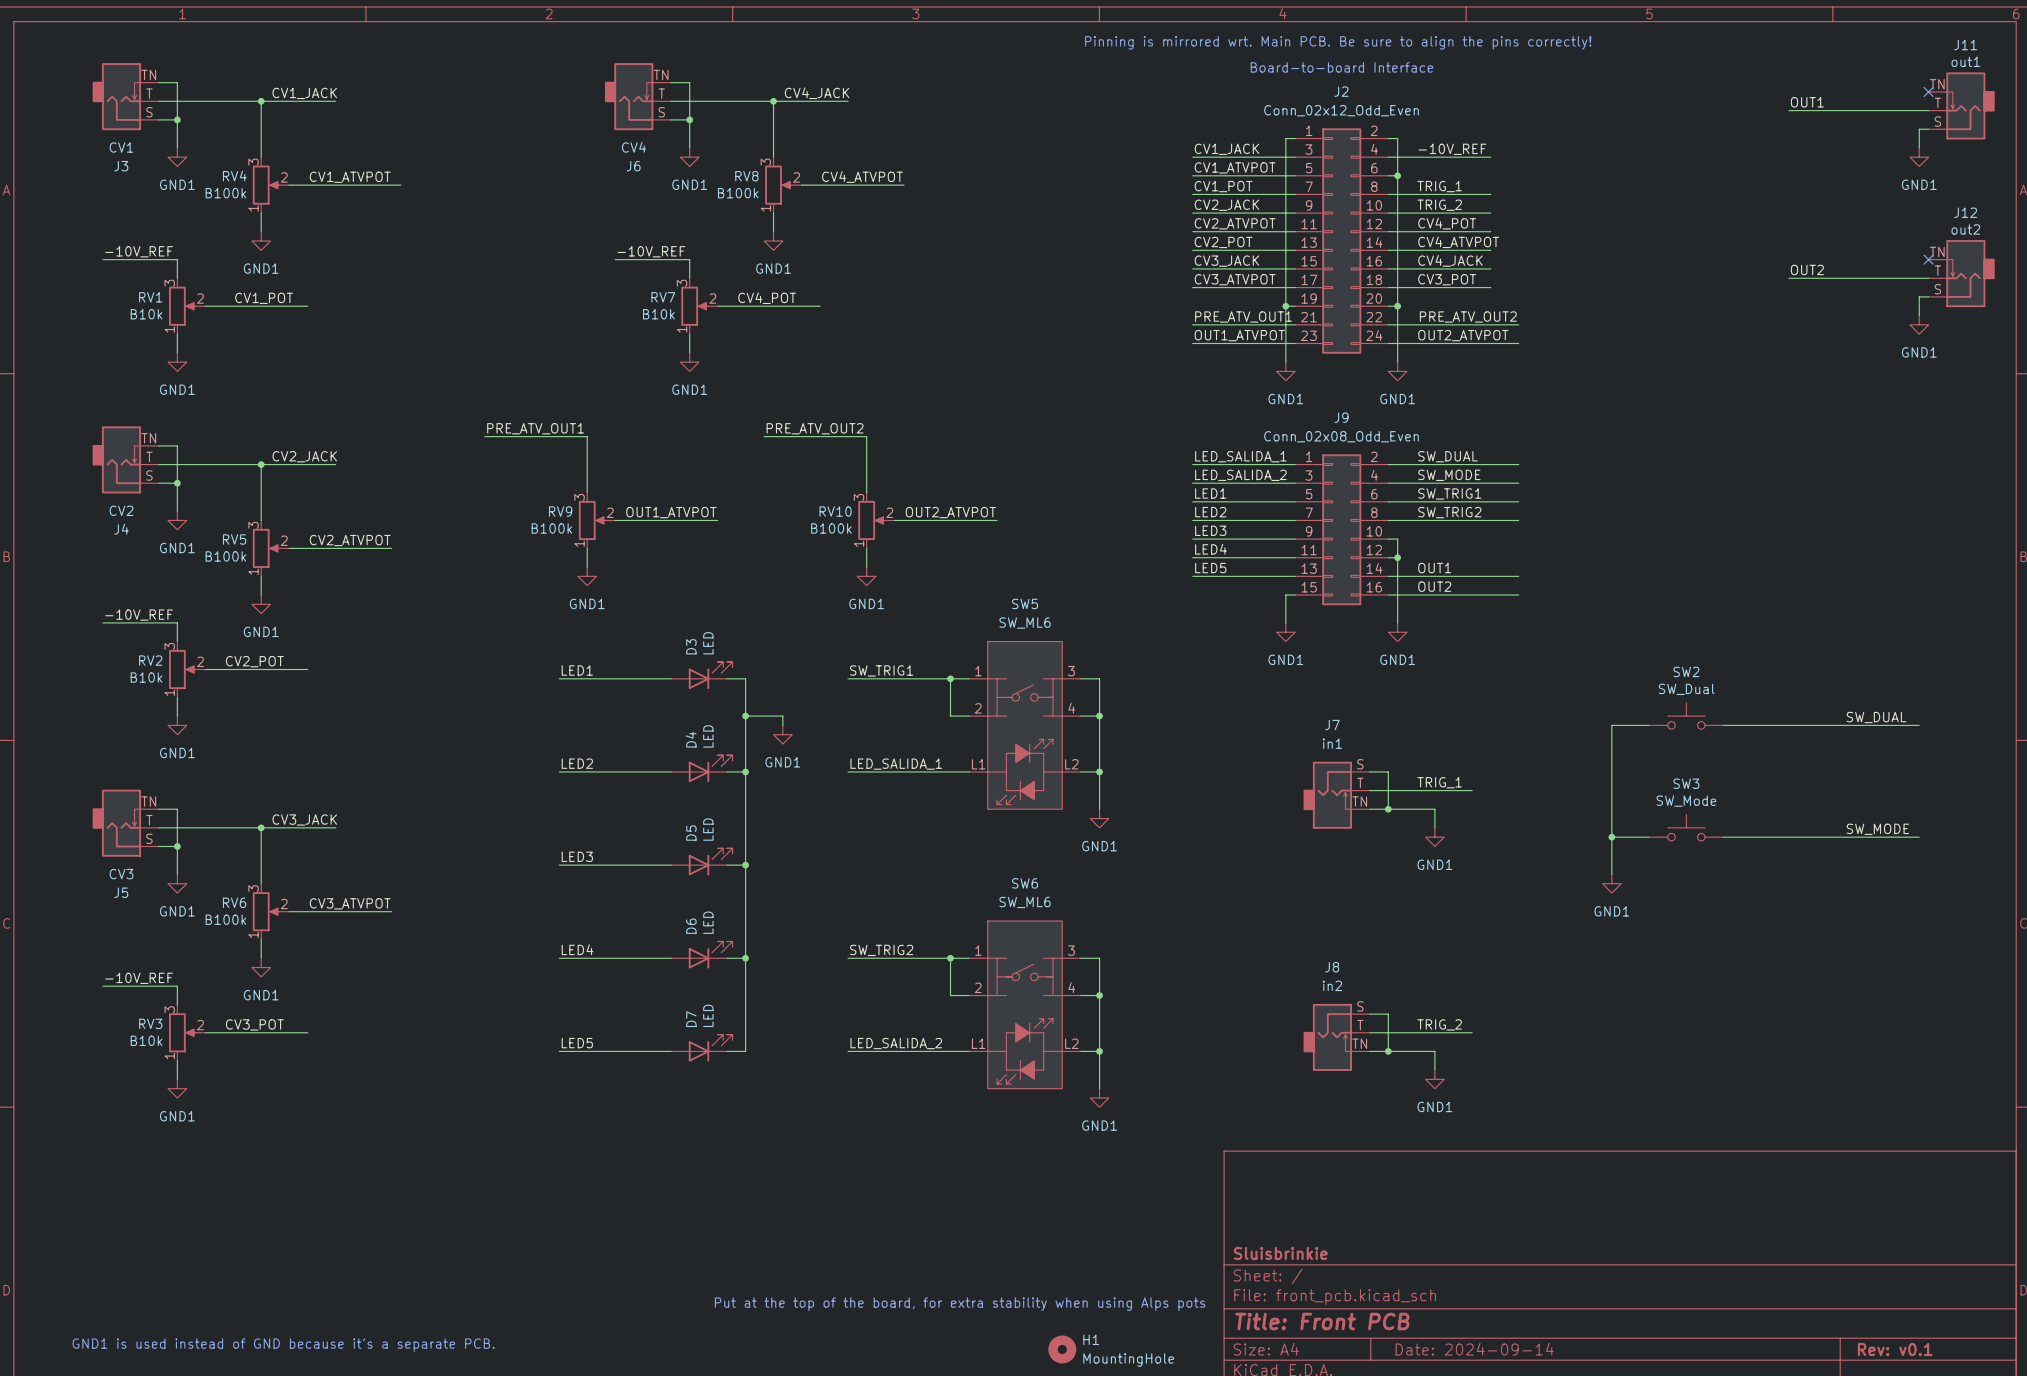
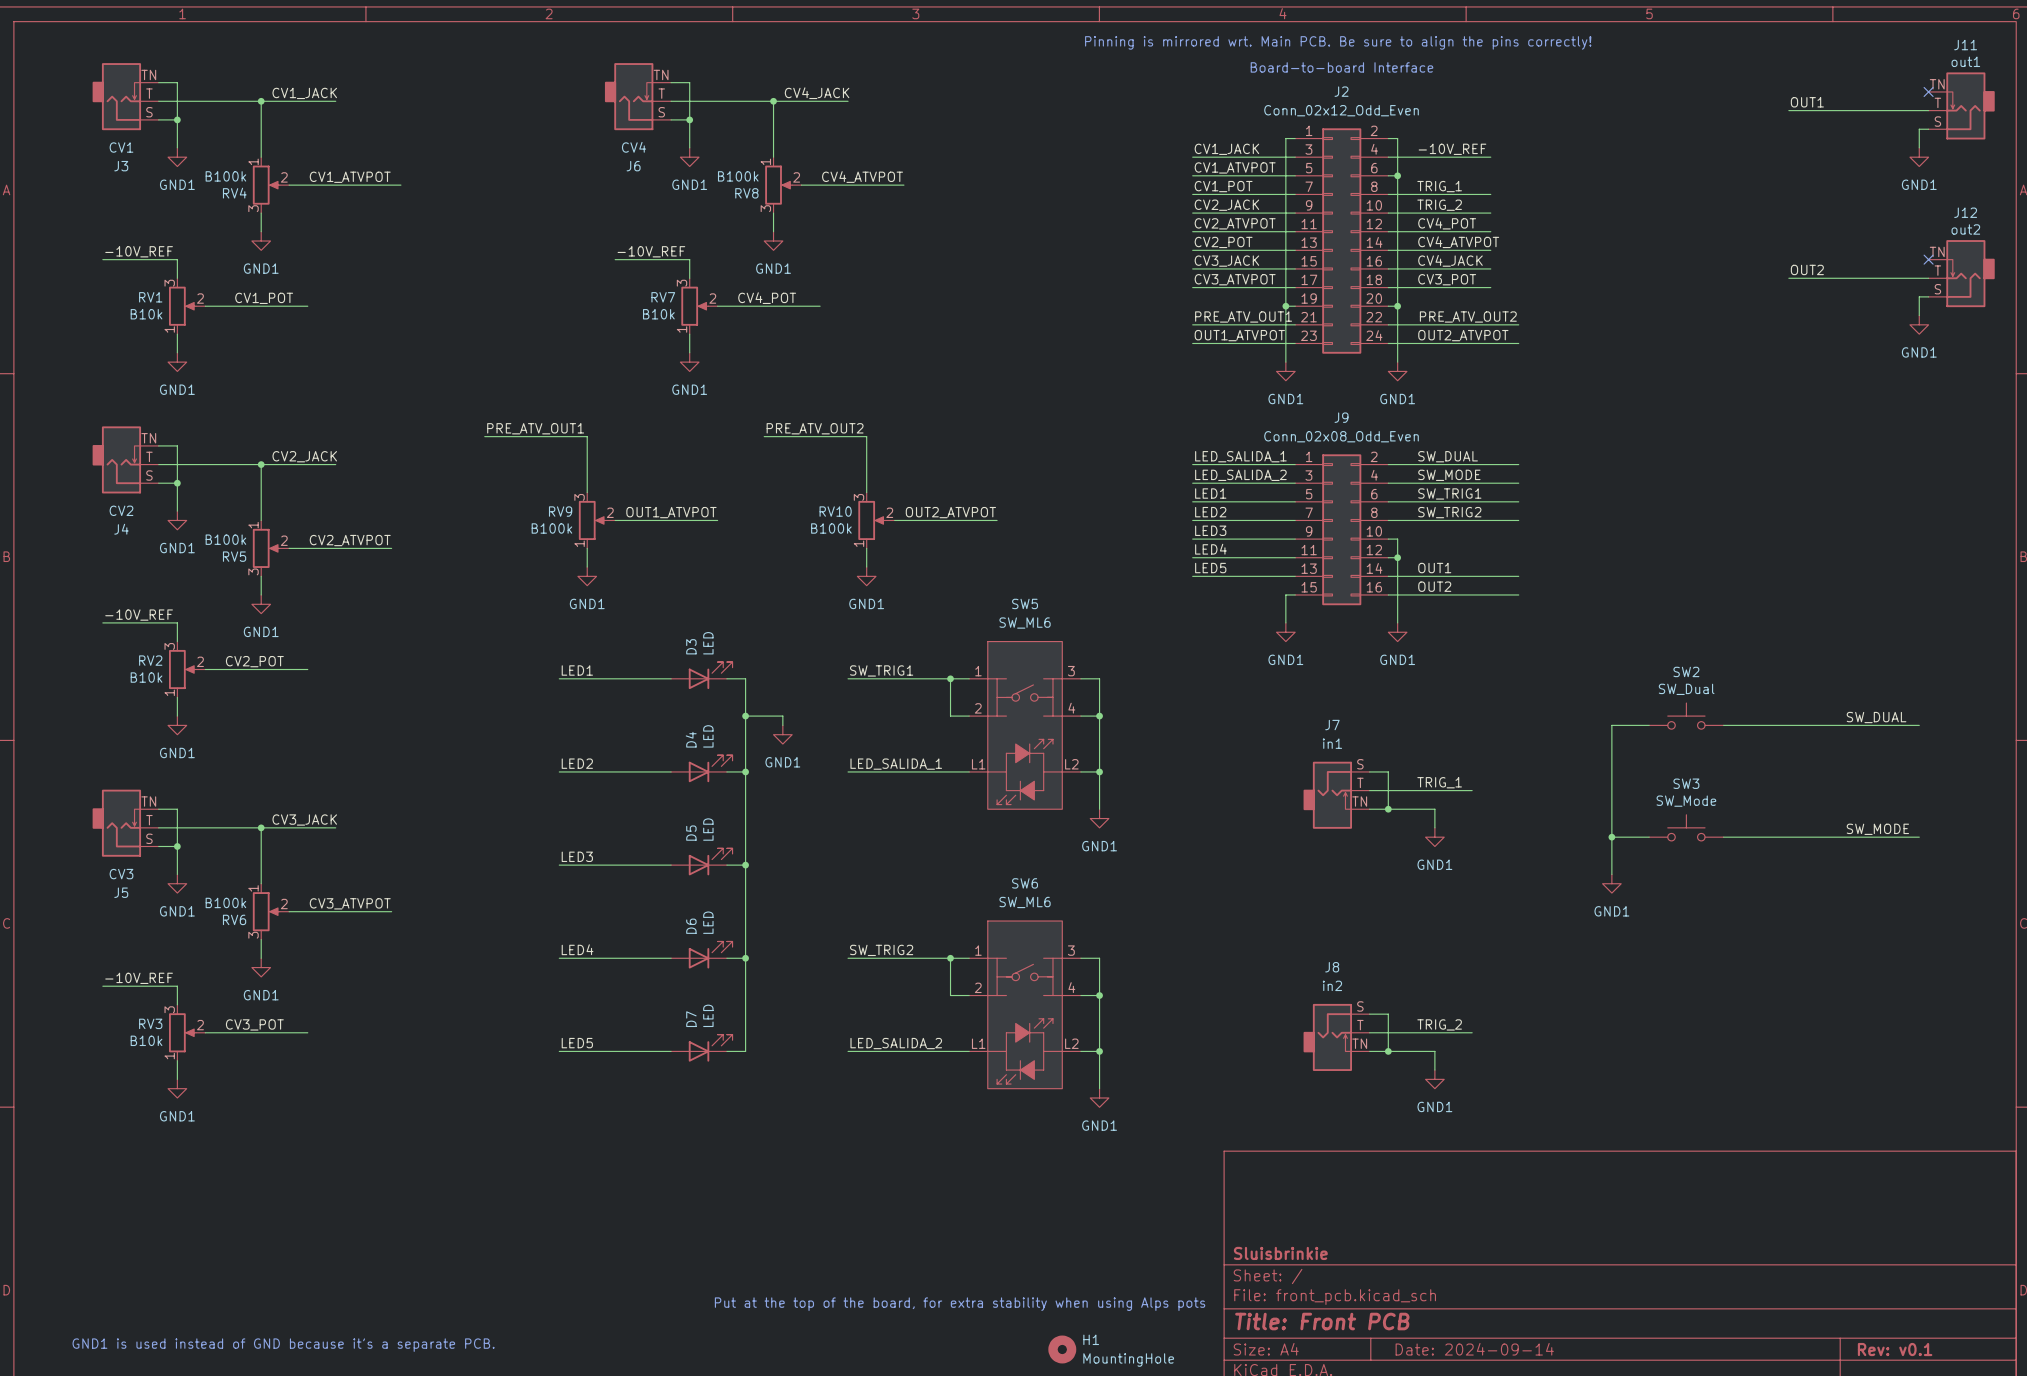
RV4 flip: as is (266, 185) -> up-down (266, 185)
RV8 flip: as is (778, 185) -> up-down (778, 185)
RV5 flip: as is (266, 548) -> up-down (266, 548)
RV6 flip: as is (266, 911) -> up-down (266, 911)

